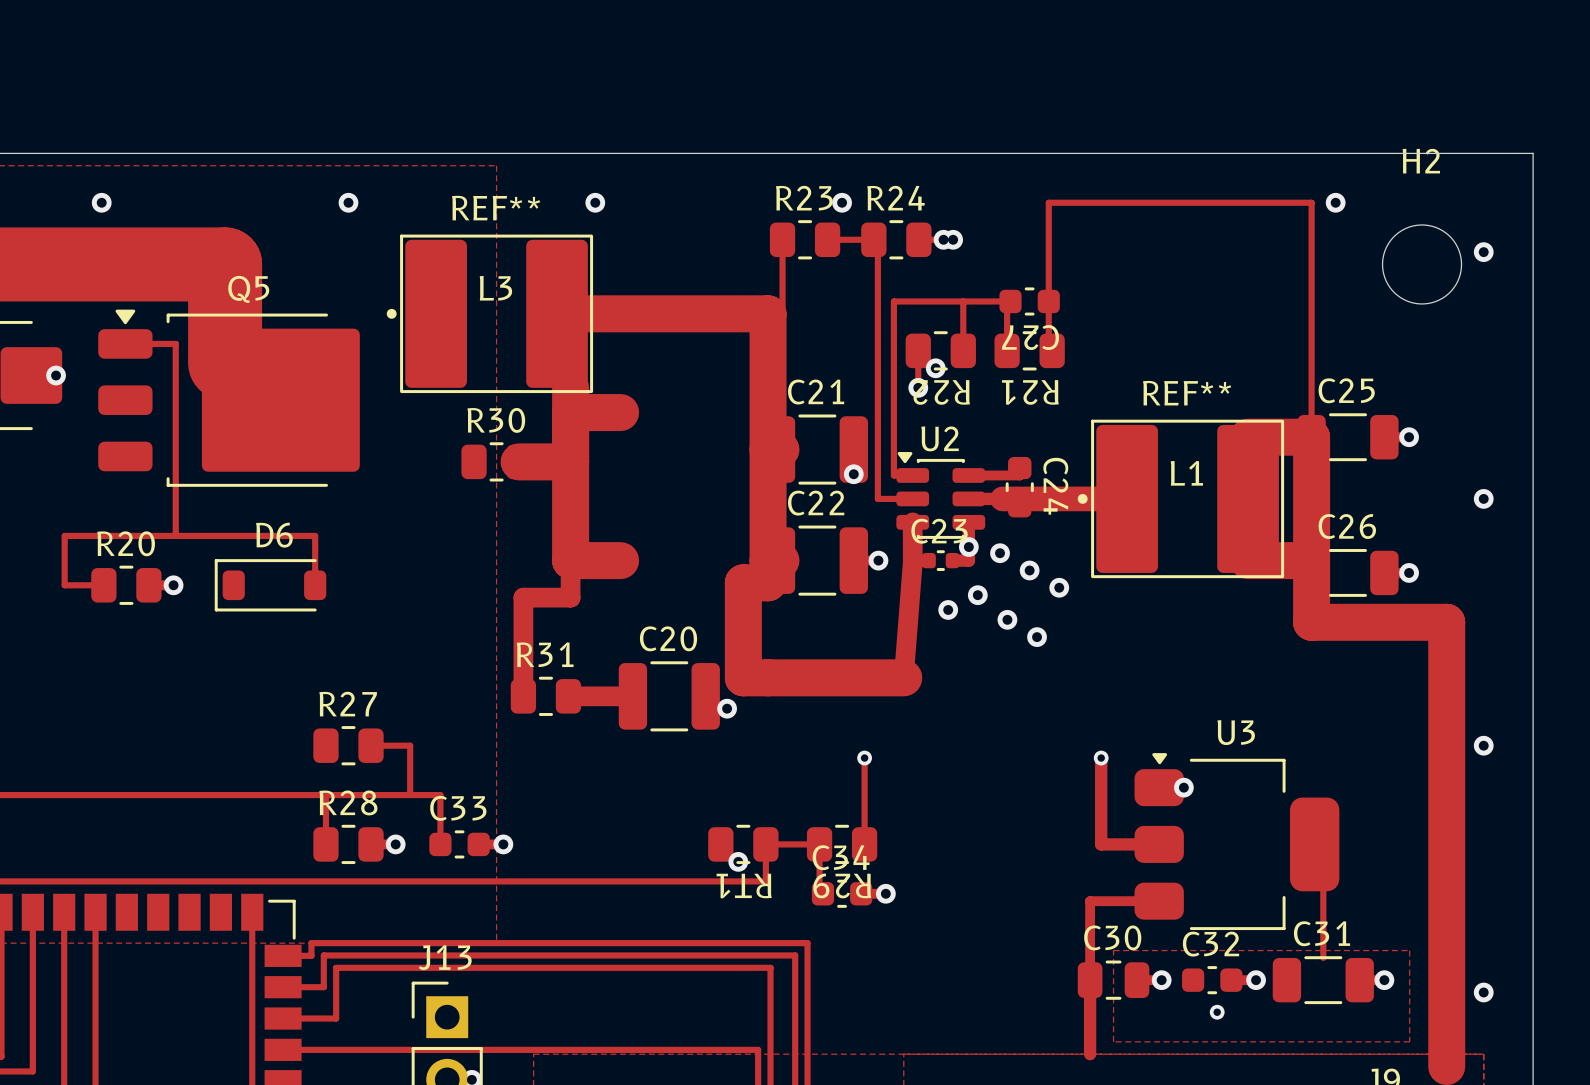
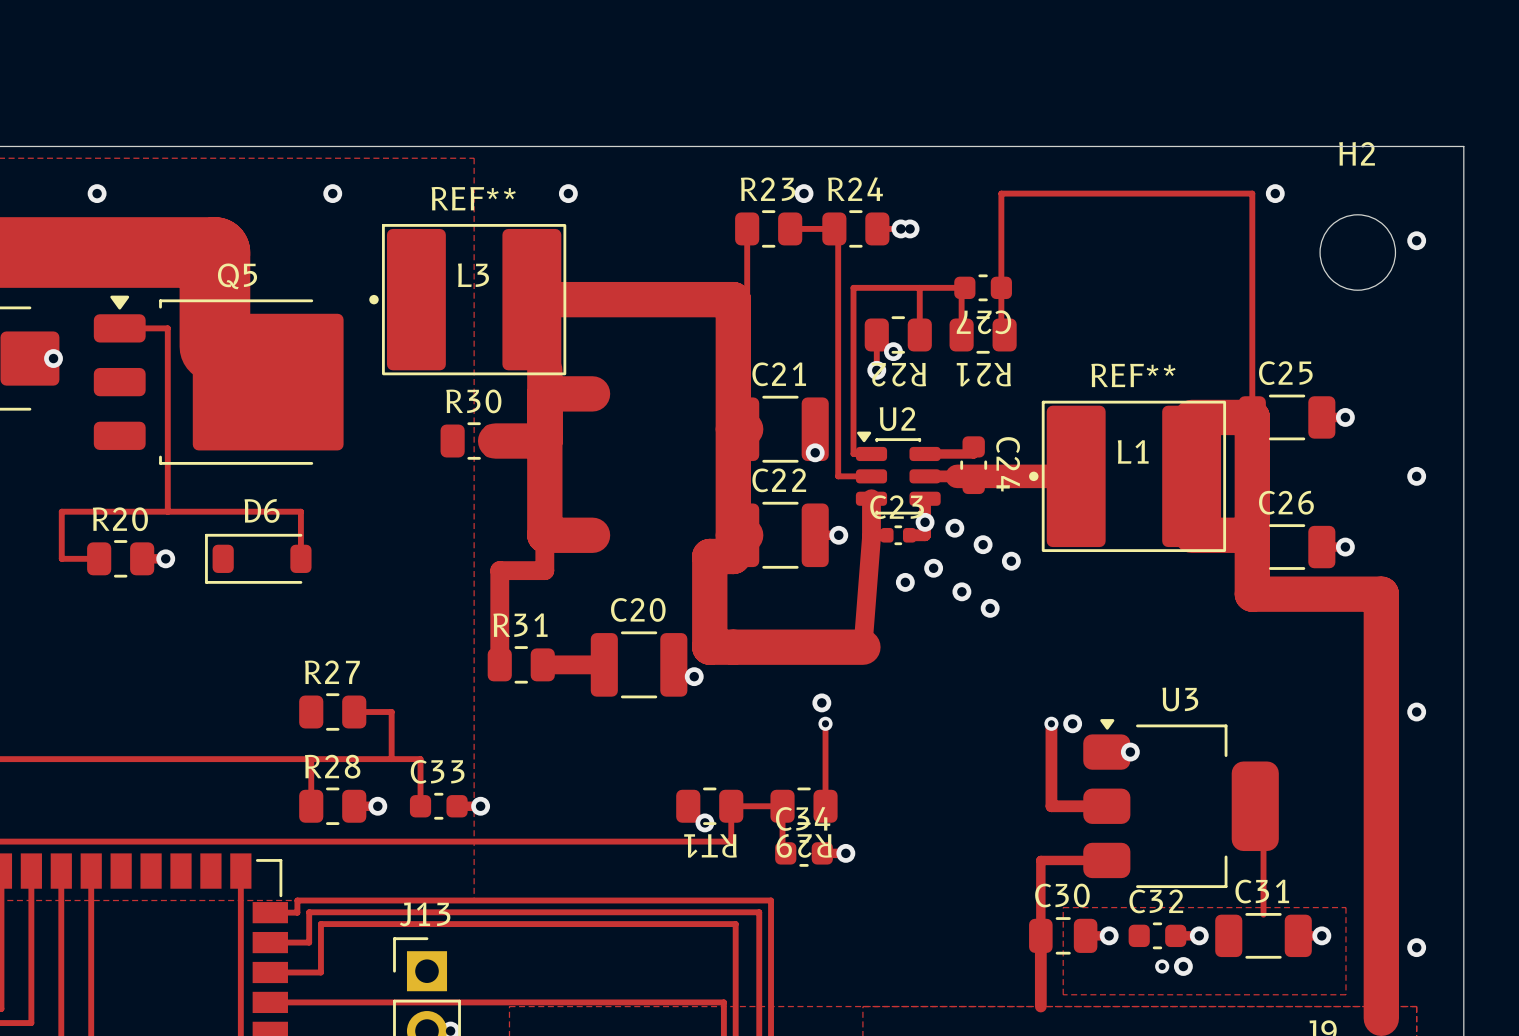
via: none -> (821, 702)
via: none -> (1072, 723)
via: none -> (1183, 966)

